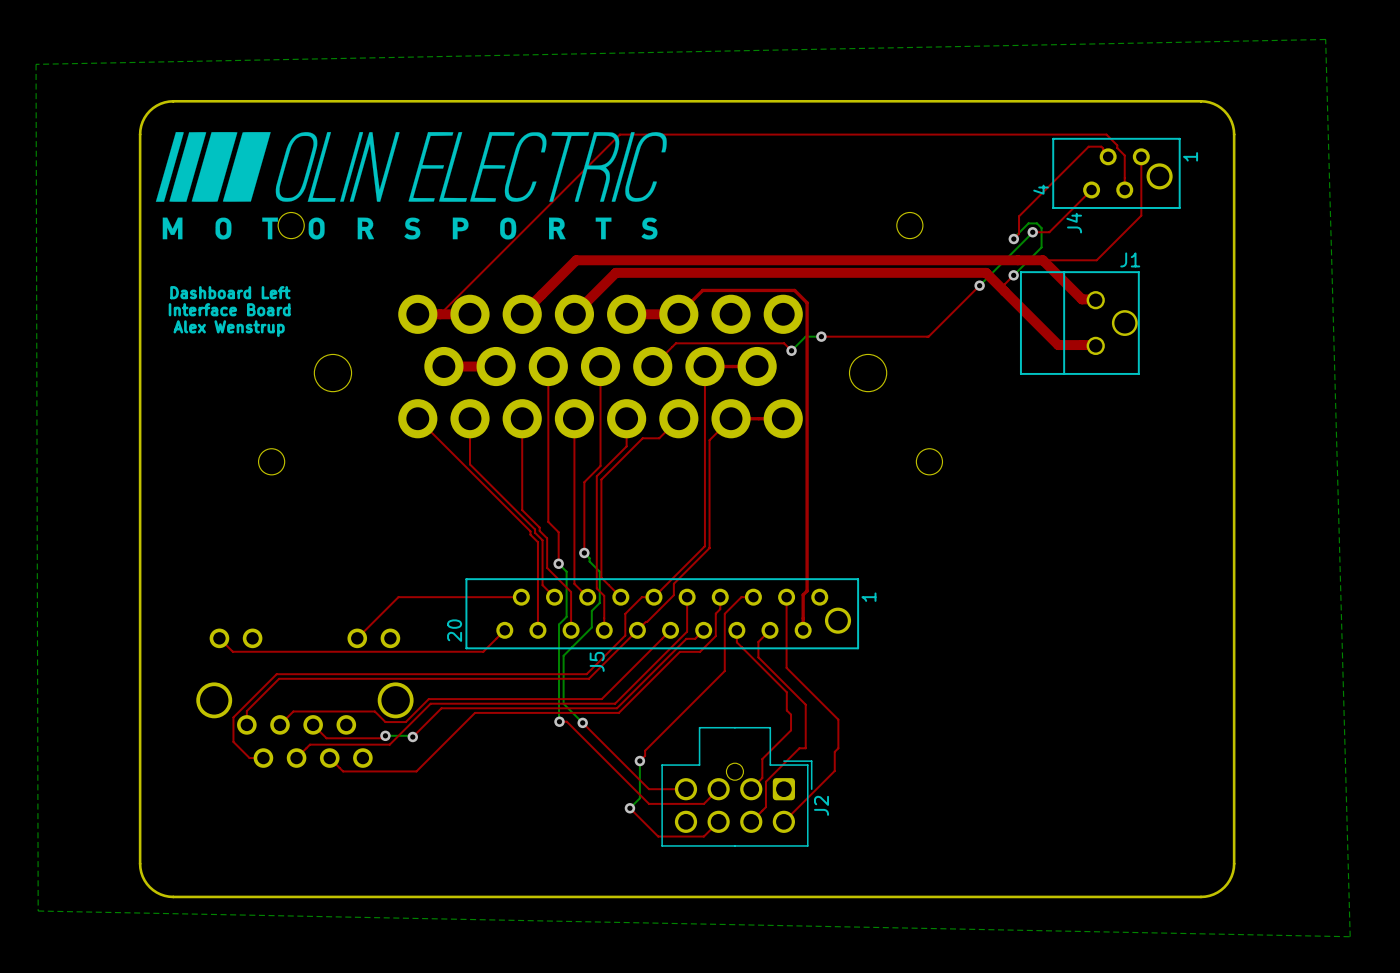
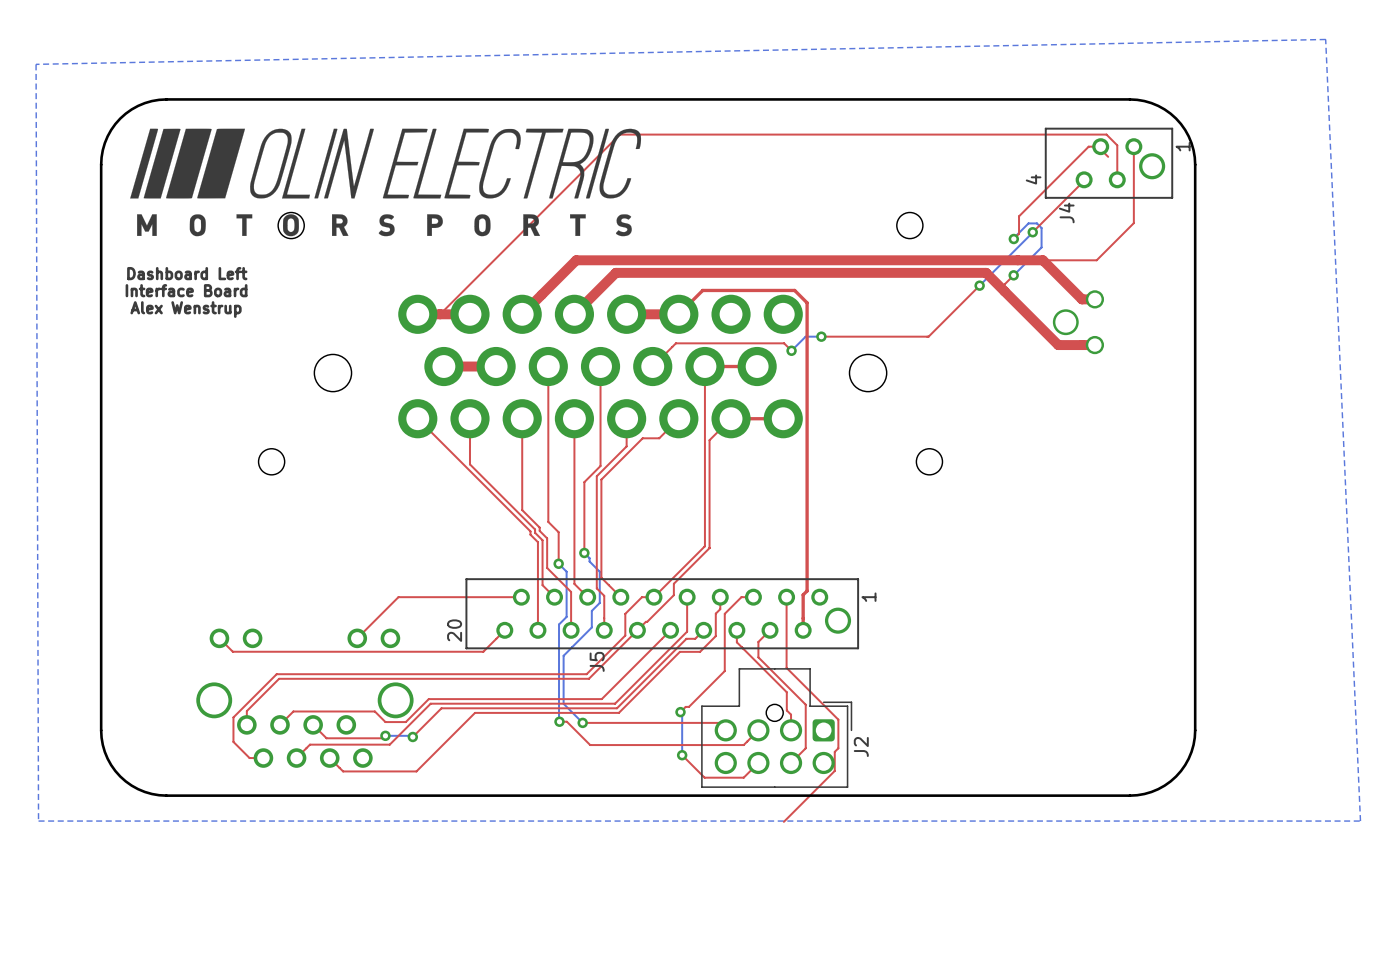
bottom zone outline: (1325, 39) (1350, 936) (38, 911) (36, 64) -> (1325, 39) (1360, 821) (38, 821) (36, 64)
board edge: (173, 101) (1200, 101) (1209, 102) (1221, 108) (1231, 121) (1234, 134) (1234, 863) (1233, 872) (1227, 883) (1217, 892) (1200, 896) (173, 896) (164, 895) (153, 890) (142, 876) (140, 863) (140, 134) (142, 121) (149, 111) (160, 103) (173, 101) -> (166, 99) (144, 103) (131, 109) (120, 118) (107, 136) (102, 150) (101, 164) (101, 730) (102, 744) (107, 758) (120, 776) (131, 785) (151, 794) (166, 795) (1129, 795) (1144, 794) (1164, 785) (1176, 776) (1185, 765) (1193, 744) (1195, 730) (1195, 164) (1193, 150) (1185, 129) (1176, 118) (1164, 109) (1144, 101) (1129, 99) (166, 99)
top track: (1117, 148) (1124, 155) (1124, 189) -> (1117, 148) (1117, 179)
top track: (1141, 156) (1141, 215) (1133, 223) -> (1133, 146) (1133, 223)
J4 position: (1116, 173) -> (1108, 163)
drawing position: (411, 185) -> (385, 182)
top track: (1091, 189) (1049, 232) (1032, 232) -> (1084, 179) (1032, 232)
text position: Dashboard Left (230, 292) -> Dashboard Left (187, 273)
text position: Interface Board (229, 309) -> Interface Board (186, 290)
J1 side: top (1079, 323) -> bottom (1078, 322)
text position: Alex Wenstrup (229, 328) -> Alex Wenstrup (186, 309)
top track: (688, 706) (645, 750) (645, 755) (639, 761) -> (688, 706) (685, 706) (680, 712)
bottom track: none -> (680, 712) (682, 713) (682, 755)
via: none -> (680, 712)
top track: (582, 722) (649, 789) (685, 789) -> (582, 722) (718, 722) (725, 730)
top track: (791, 730) (762, 759) (762, 778) (751, 789) -> none
top track: (590, 745) (649, 803) (703, 803) (718, 789) -> (590, 745) (743, 745) (758, 730)
top track: (805, 748) (799, 748) (765, 781) (765, 807) (751, 821) -> (805, 748) (791, 762)
top track: none -> (682, 755) (704, 777) (743, 777) (758, 762)
via: none -> (682, 755)
bottom track: (639, 761) (639, 798) (629, 808) -> none
via: (639, 761) -> none
J2 position: (736, 786) -> (776, 728)
top track: (629, 808) (658, 836) (703, 836) (718, 821) -> none
via: (629, 808) -> none

